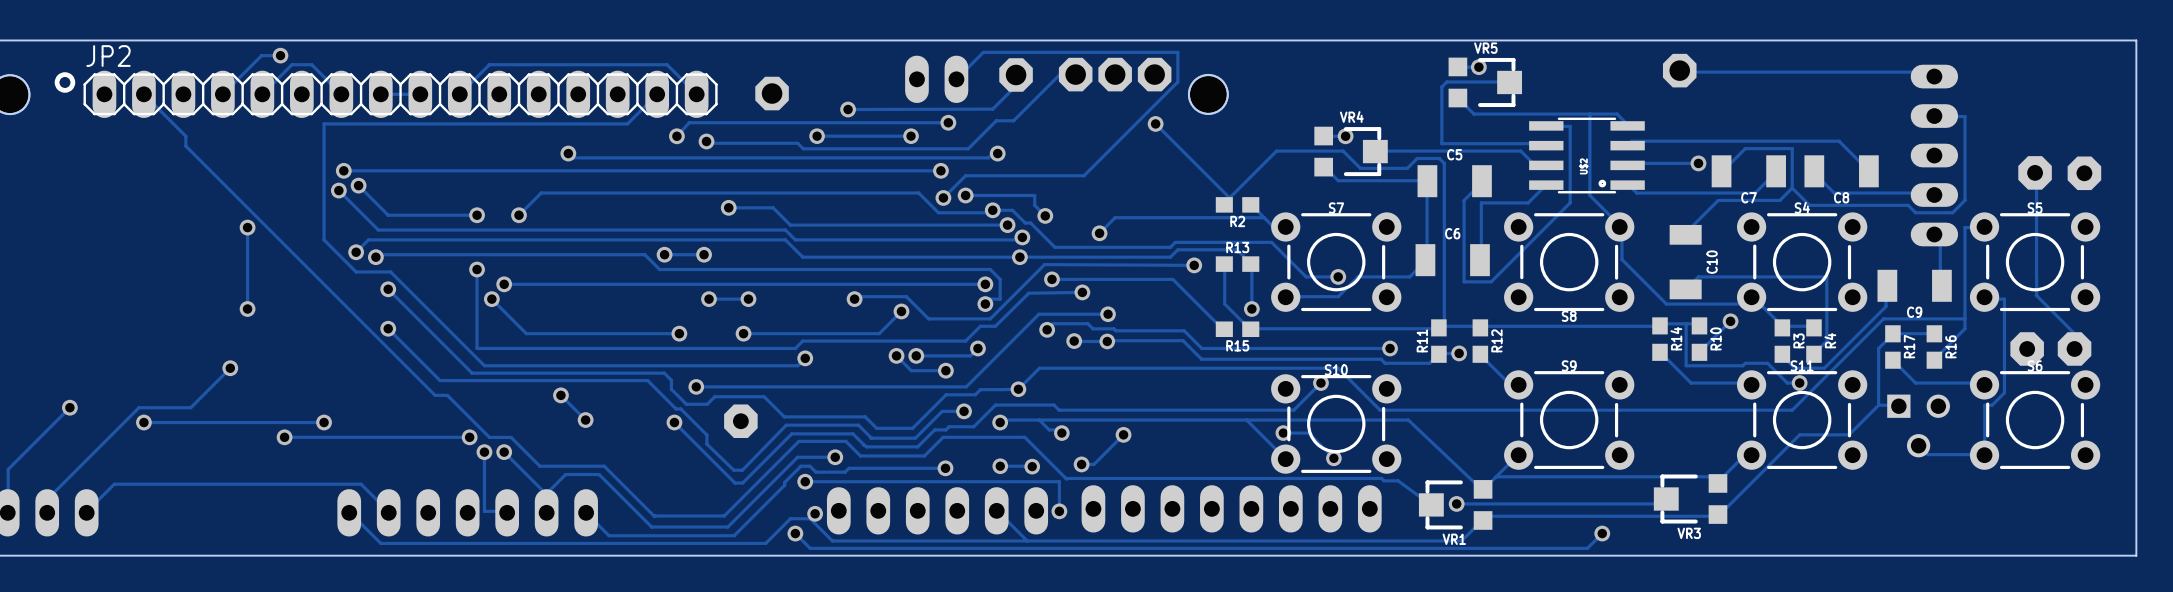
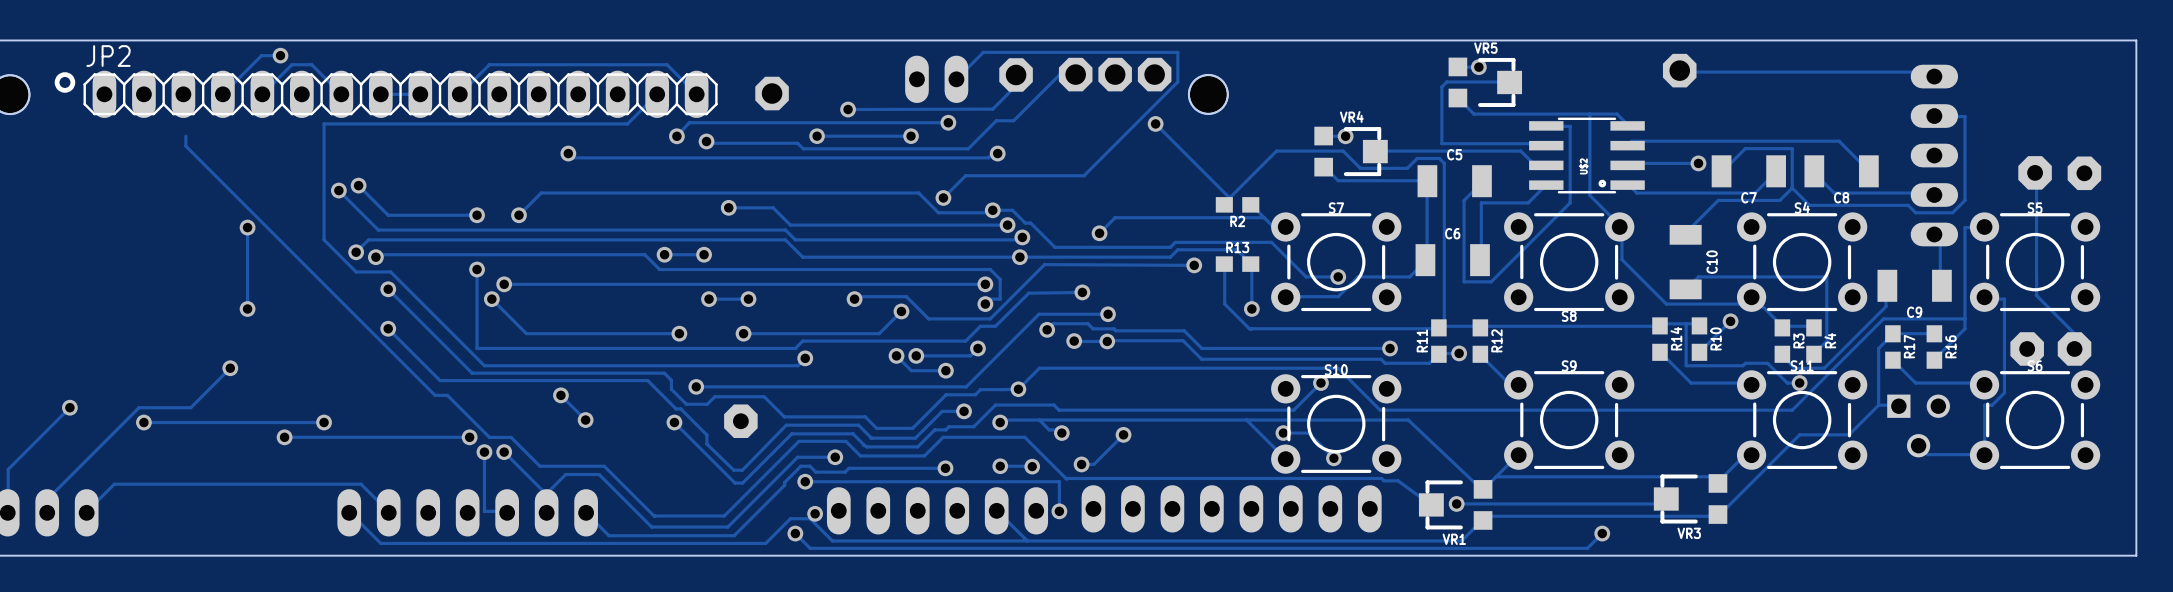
track: (143, 94) (185, 136) -> none
via: (343, 170) -> none
track: (940, 170) (343, 170) -> none
via: (940, 170) -> none
track: (965, 195) (1034, 195) (1034, 205) (1045, 215) -> none
via: (965, 195) -> none
via: (1045, 215) -> none
track: (1051, 279) (1172, 279) (1224, 329) -> none
via: (1051, 279) -> none
R15: (1237, 329) -> none

